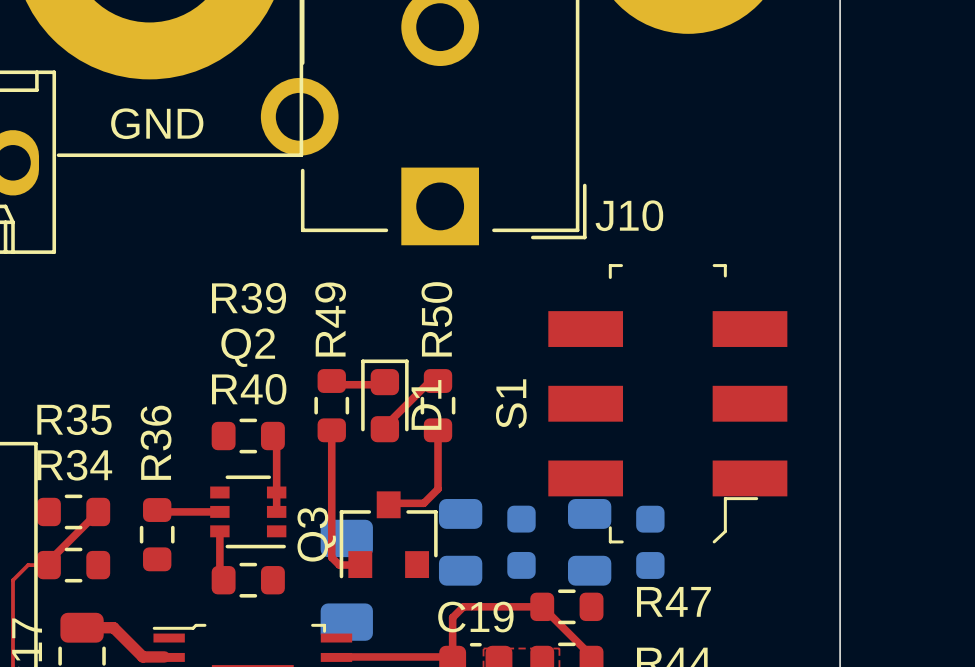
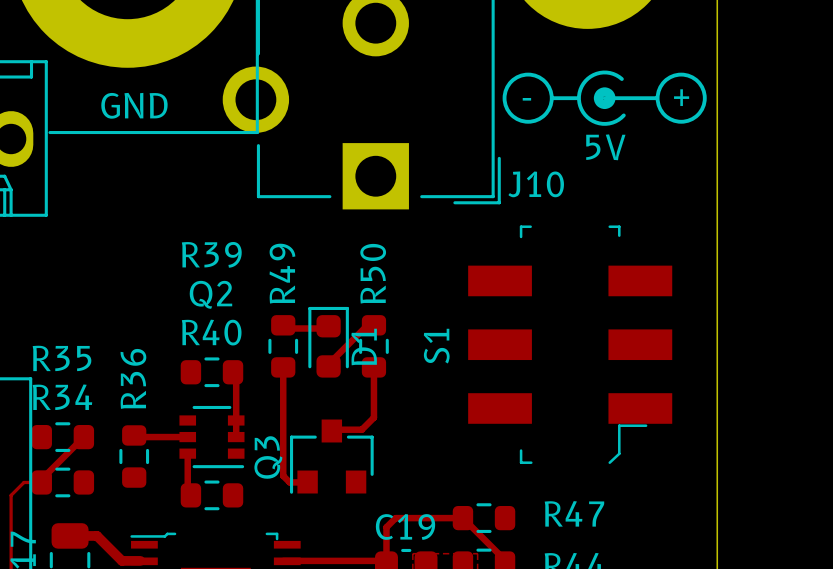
drawing: none -> [502, 70, 707, 126]
text: none -> + (681, 97)
text: none -> - (526, 99)
text: none -> 5V (605, 147)
part: (460, 542) -> none
part: (521, 542) -> none
part: (589, 542) -> none
part: (650, 542) -> none
part: (346, 580) -> none

